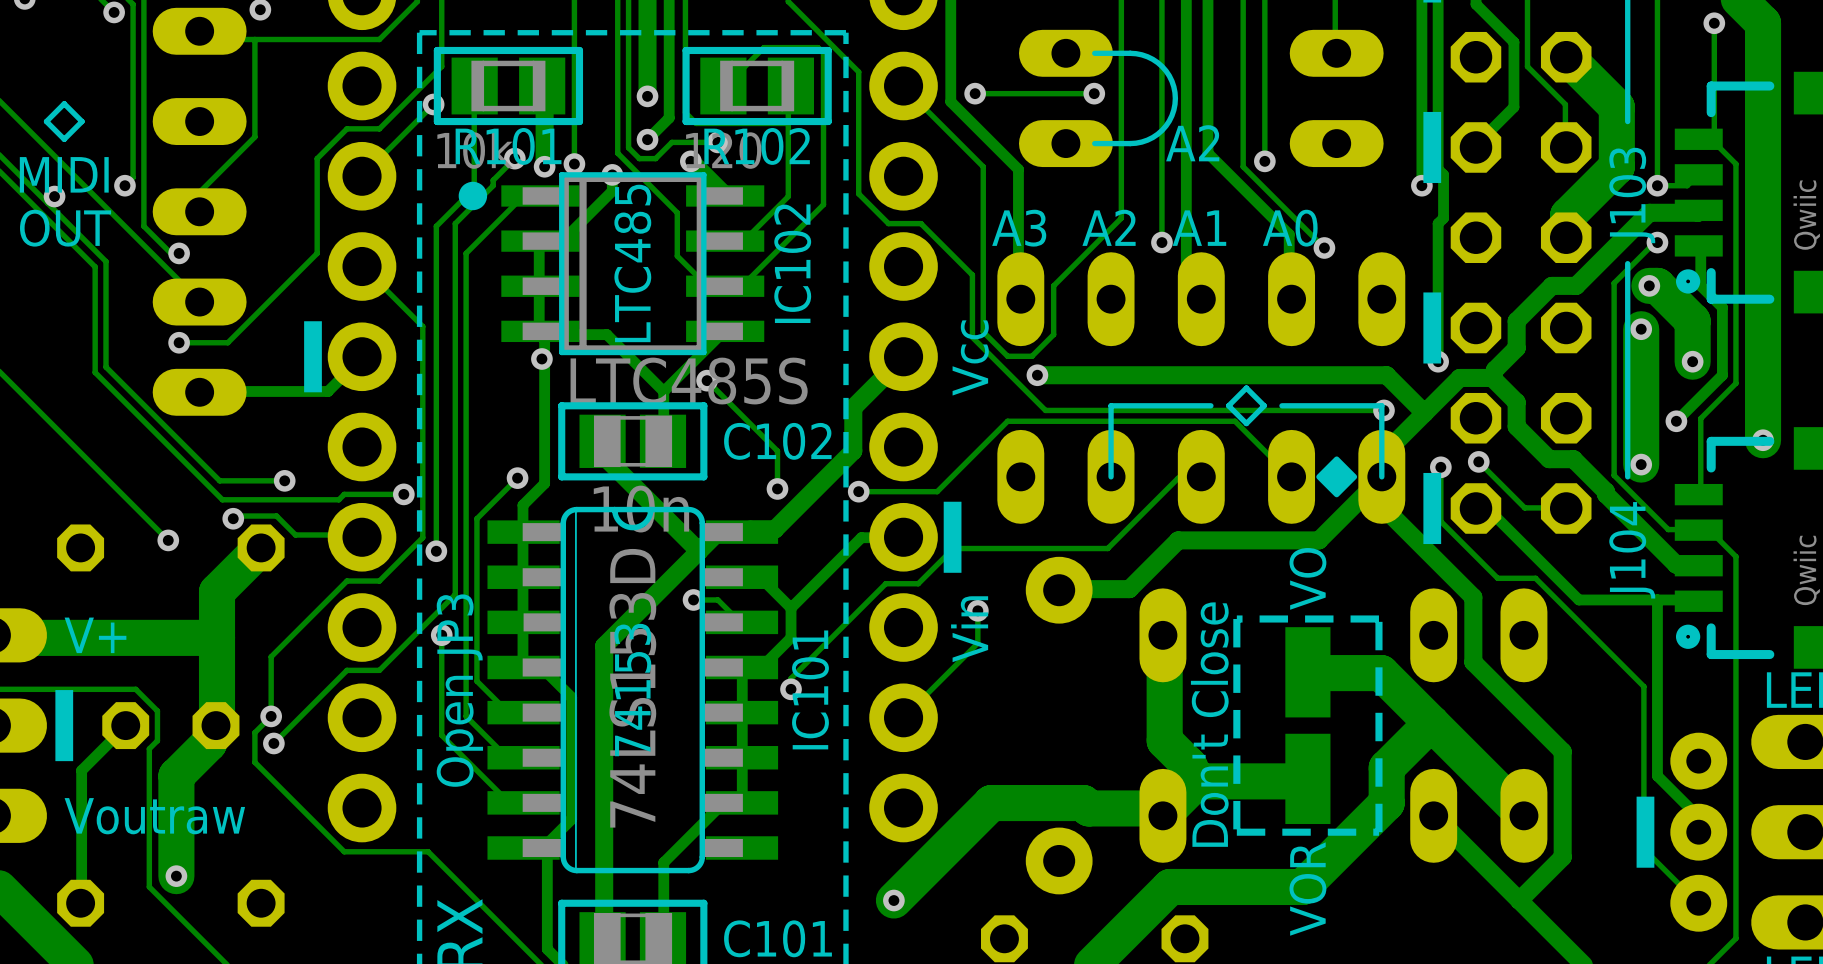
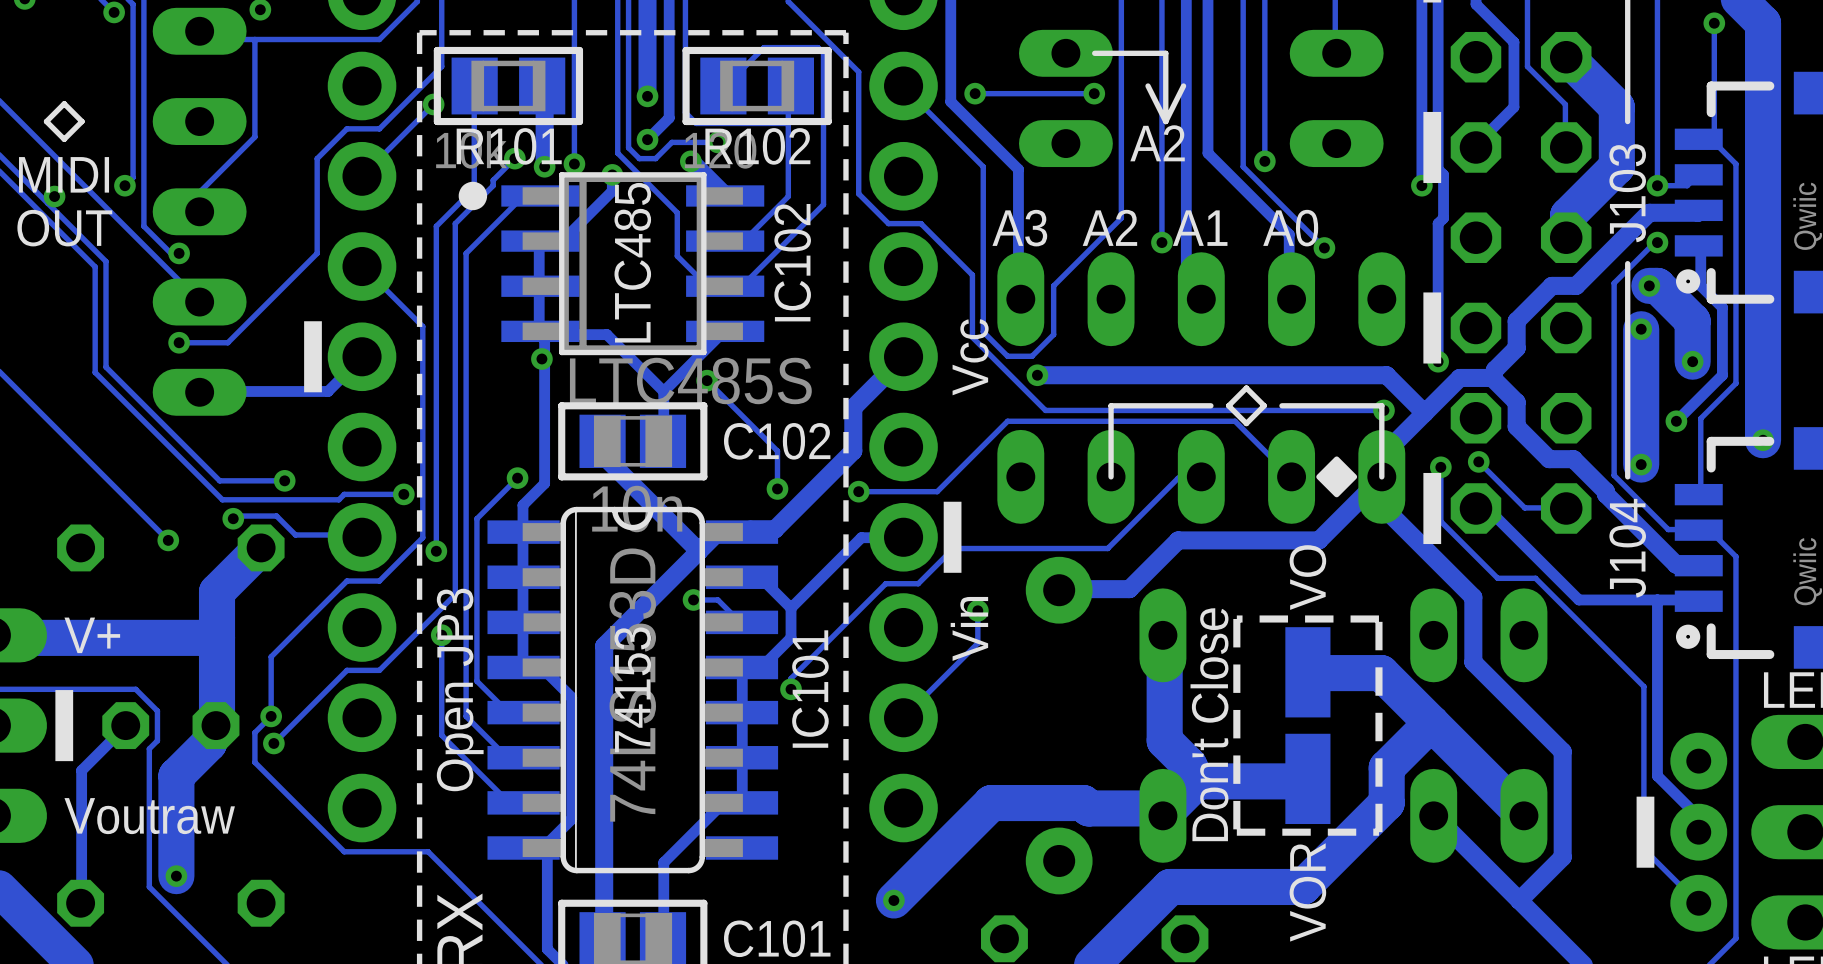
line: (1130, 53) (1141, 54) (1152, 59) (1162, 66) (1169, 75) (1173, 86) (1175, 98) (1171, 115) (1162, 130) (1147, 140) (1130, 143) (1094, 143) -> (1130, 53) (1165, 53) (1165, 121)
line: none -> (1148, 86) (1165, 121)
line: none -> (1183, 86) (1165, 121)
text position: A2 (1192, 143) -> A2 (1157, 143)

